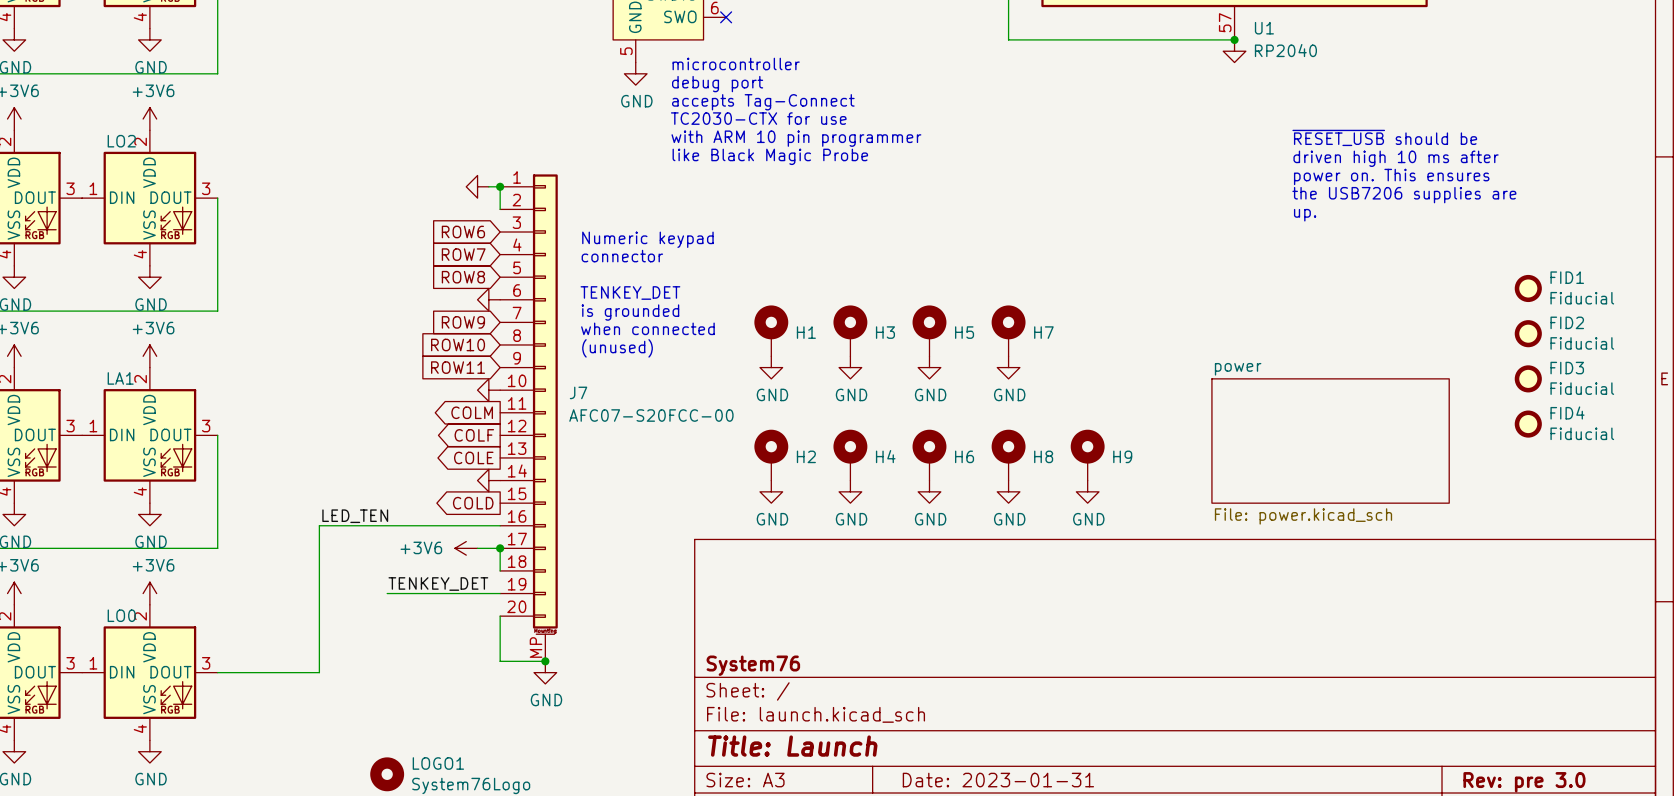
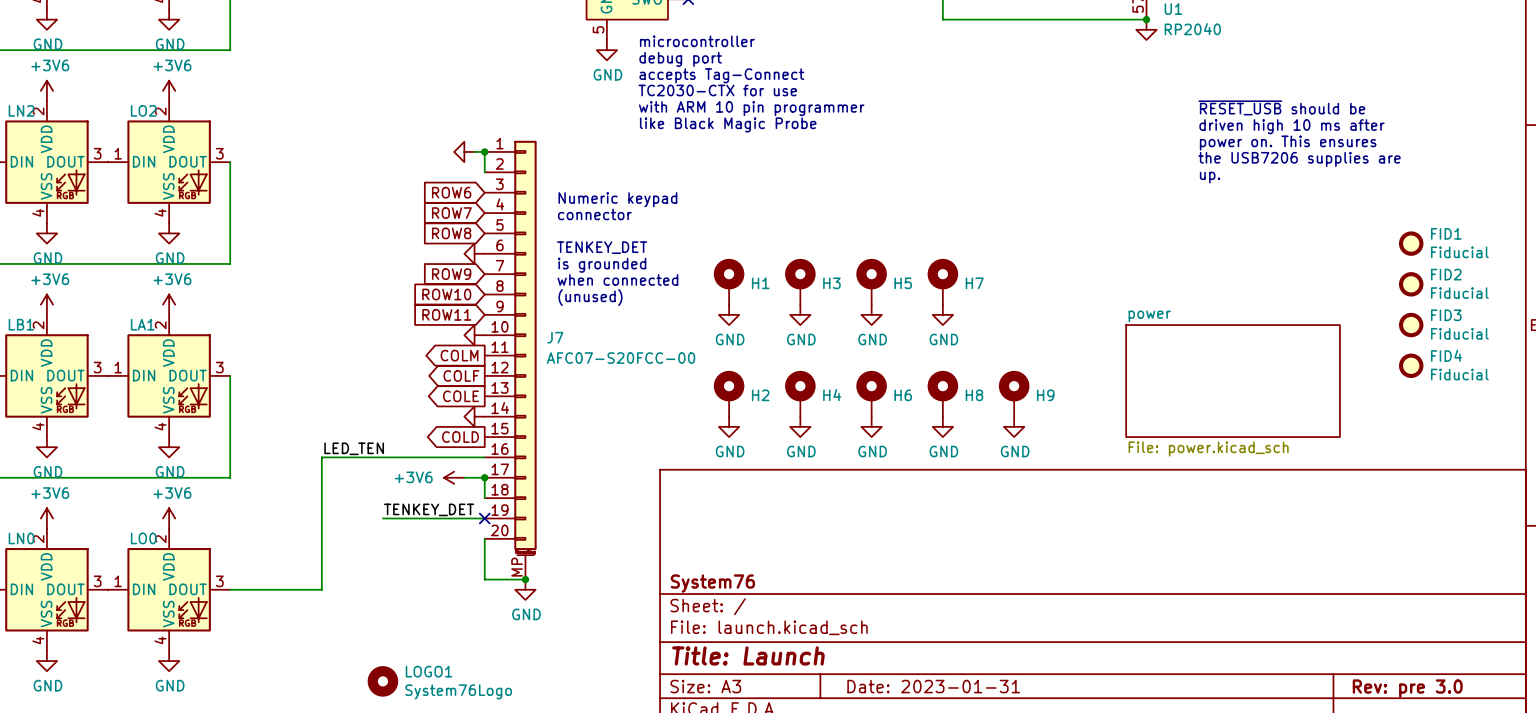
no-connect mark: none -> (484, 518)

